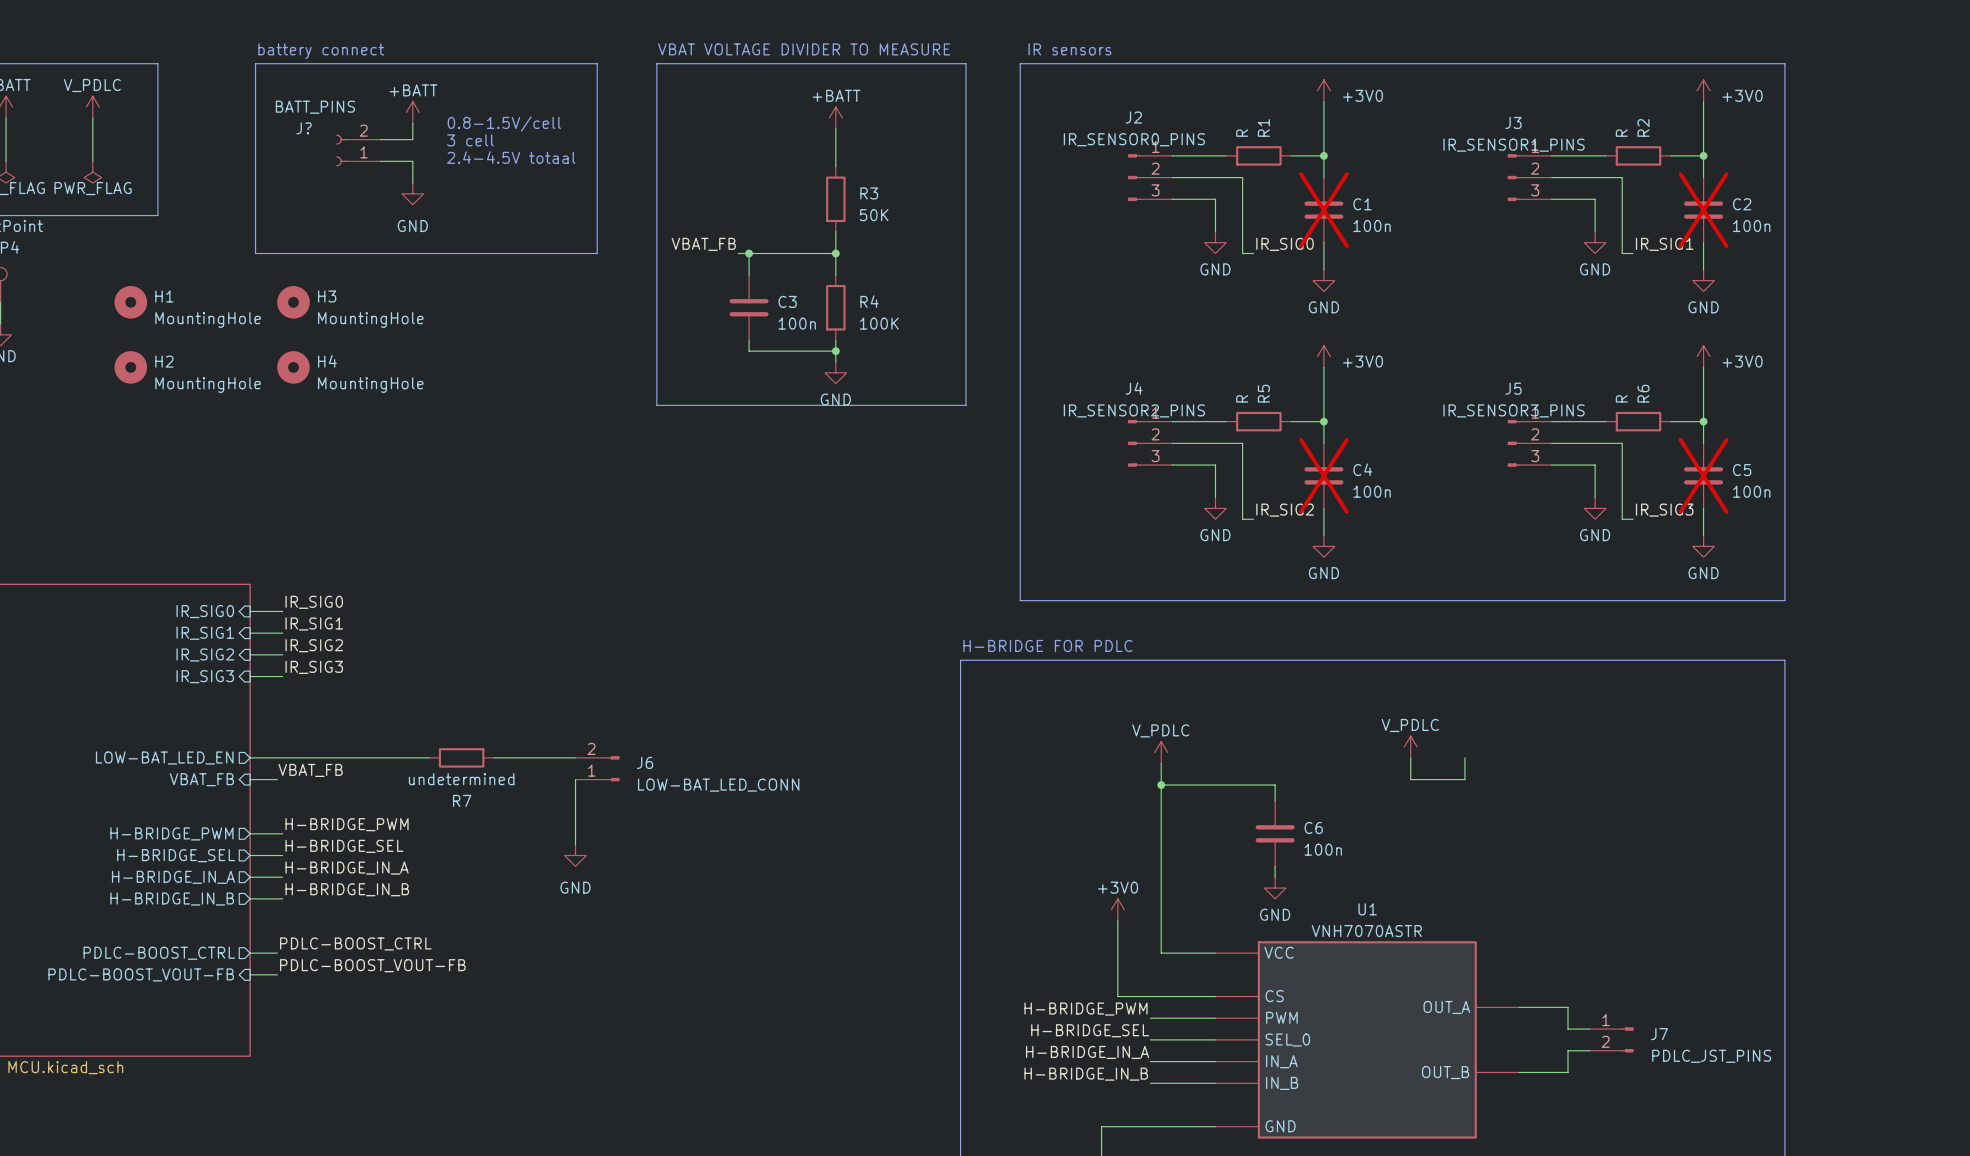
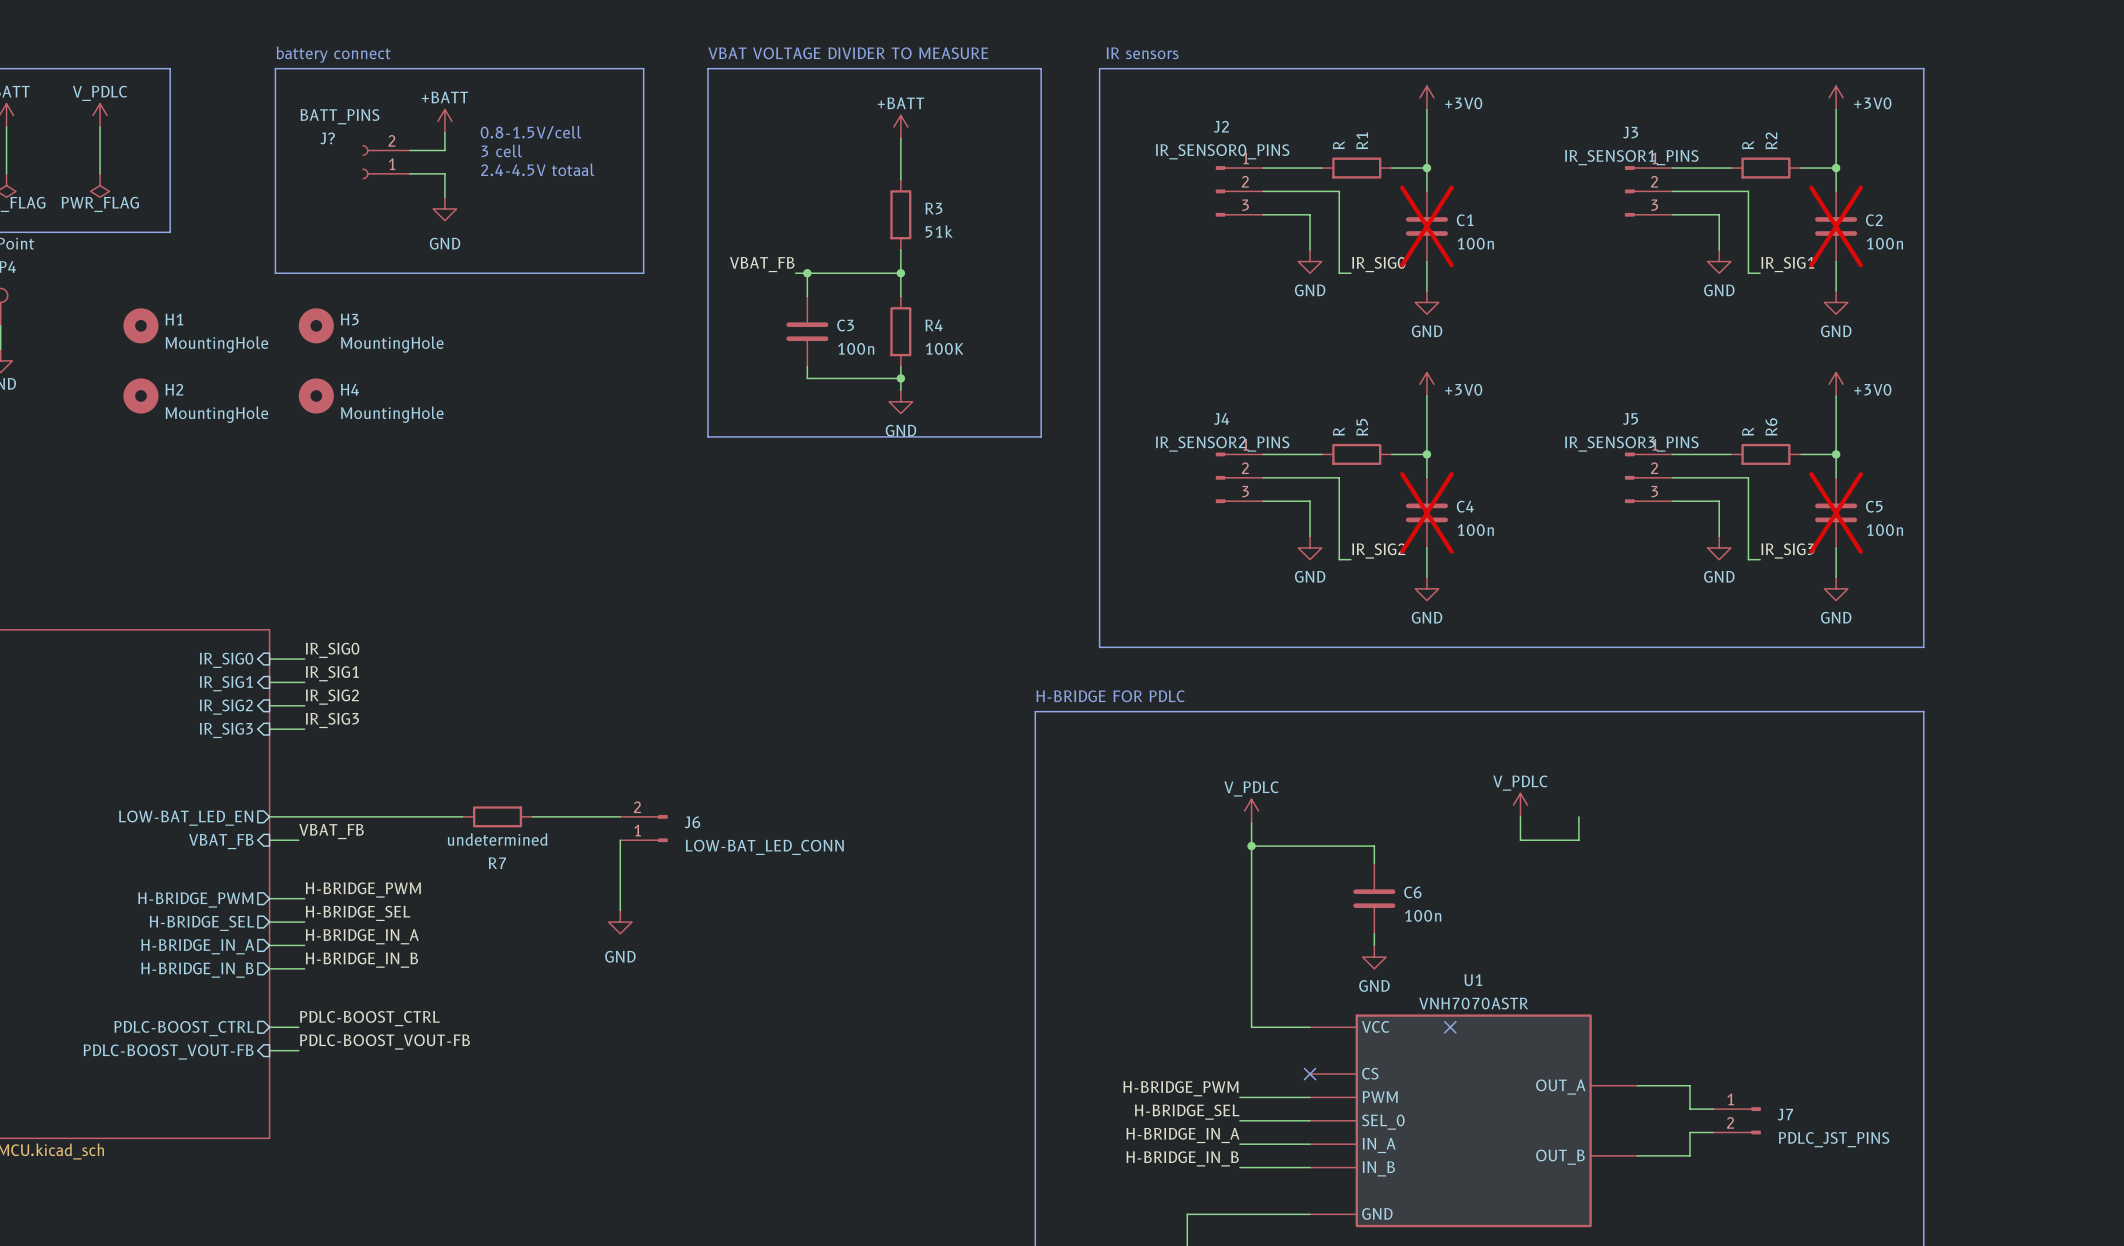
R3 value: 50K (874, 215) -> 51k (939, 231)
power symbol: +3V0 (1117, 909) -> none
wire: (1117, 920) (1117, 996) (1215, 996) -> none
no-connect mark: none -> (1450, 1027)
no-connect mark: none -> (1310, 1074)

